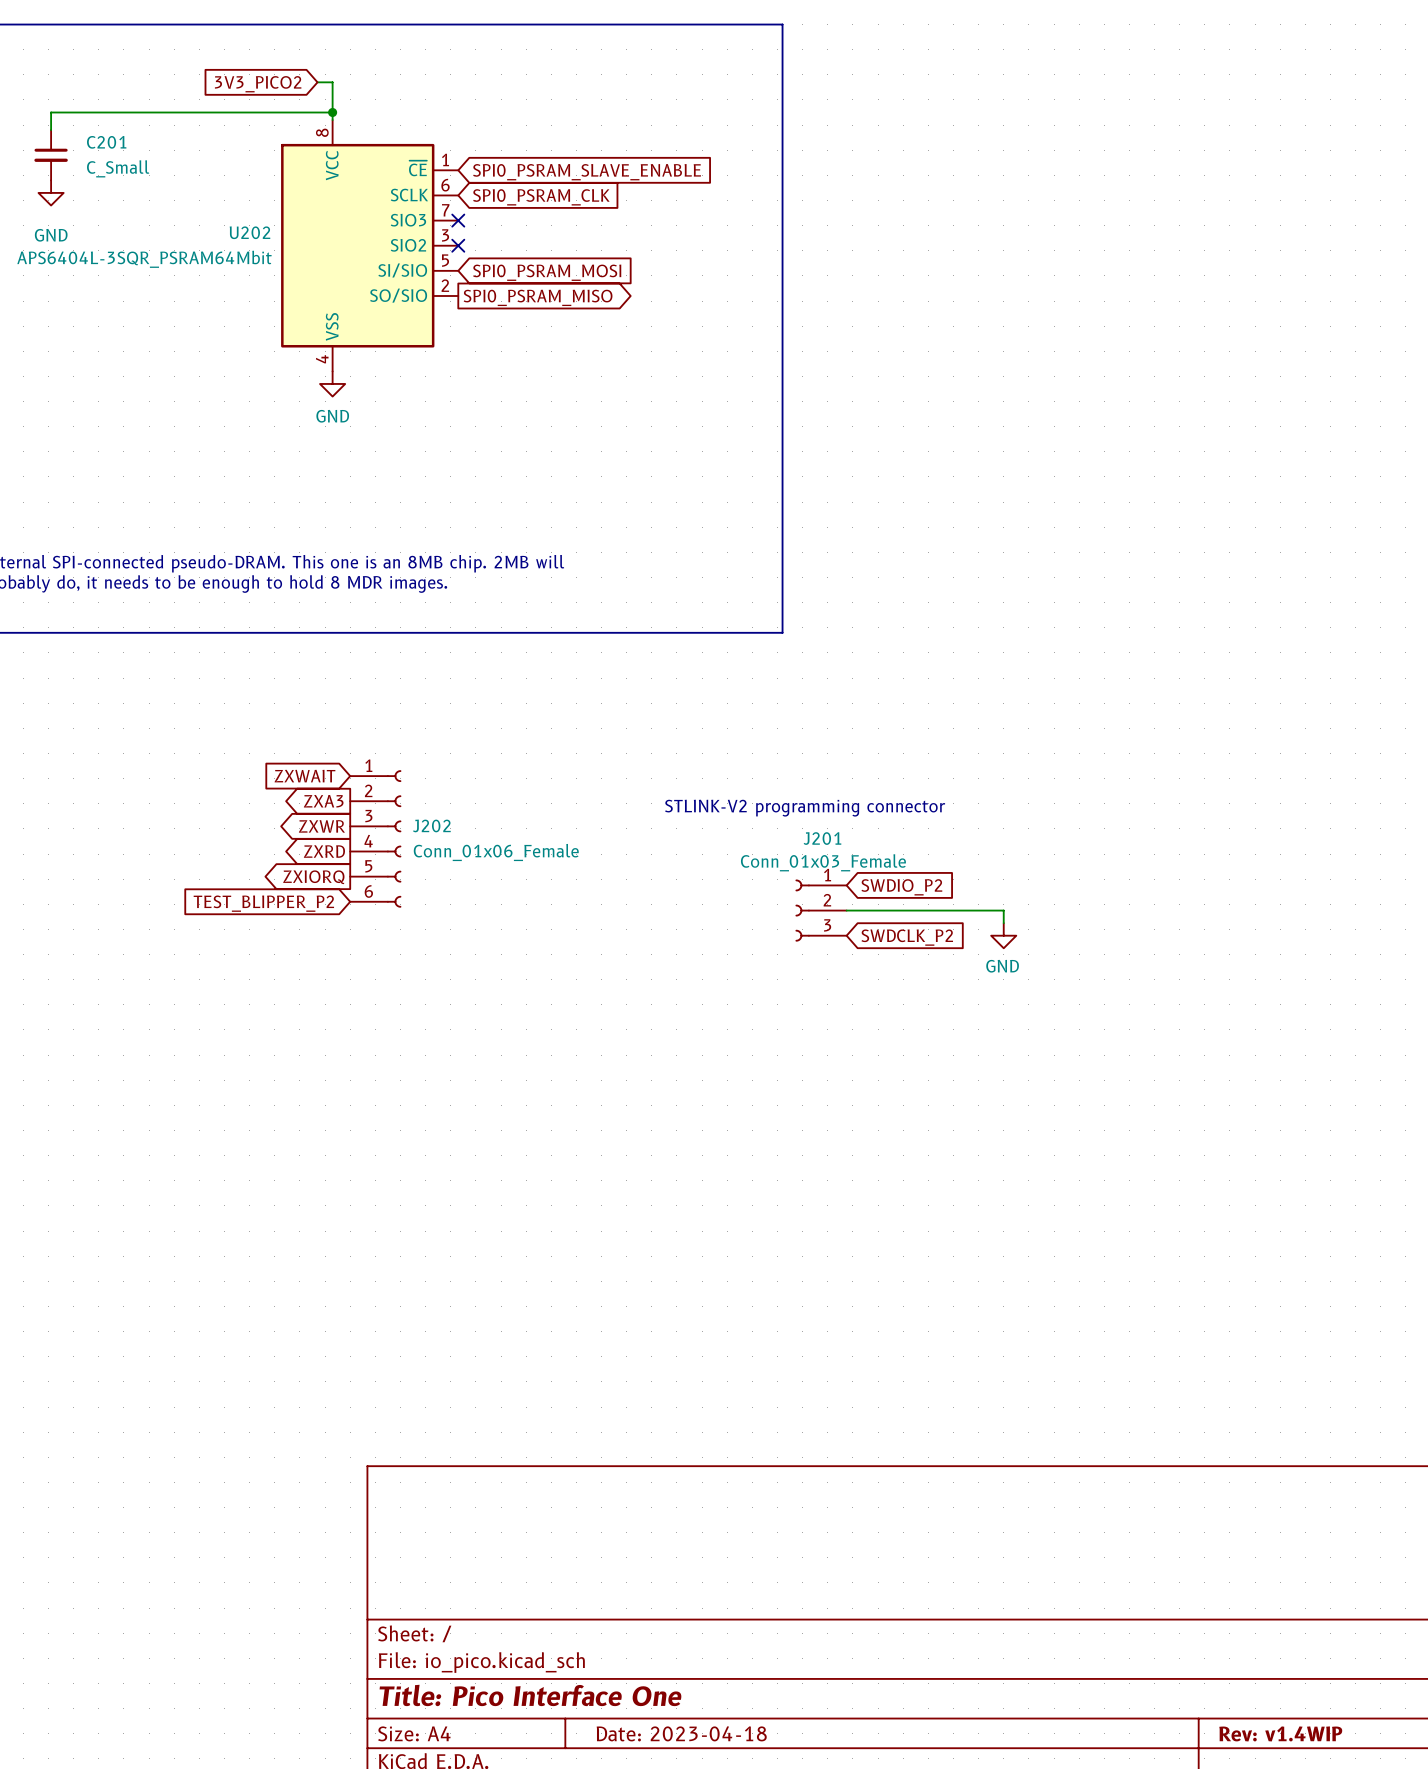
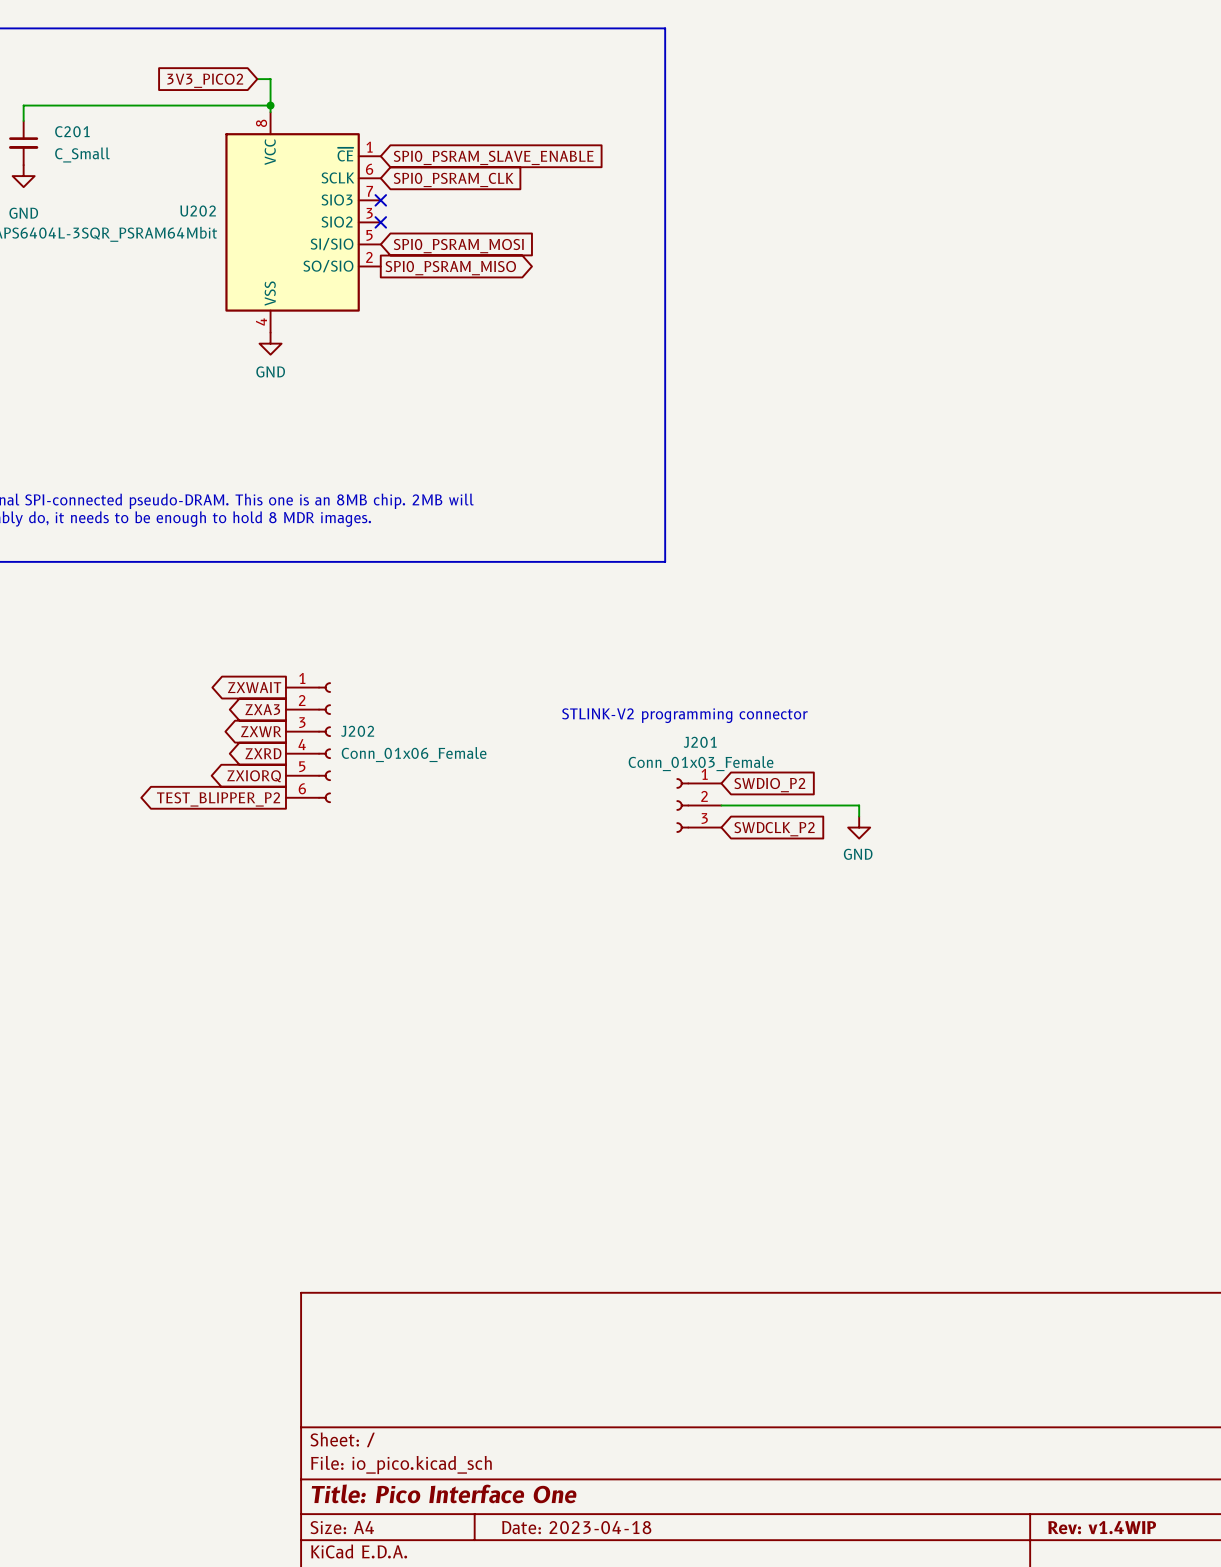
global label shape: input (304, 776) -> output (254, 687)
global label shape: input (263, 903) -> output (218, 799)

